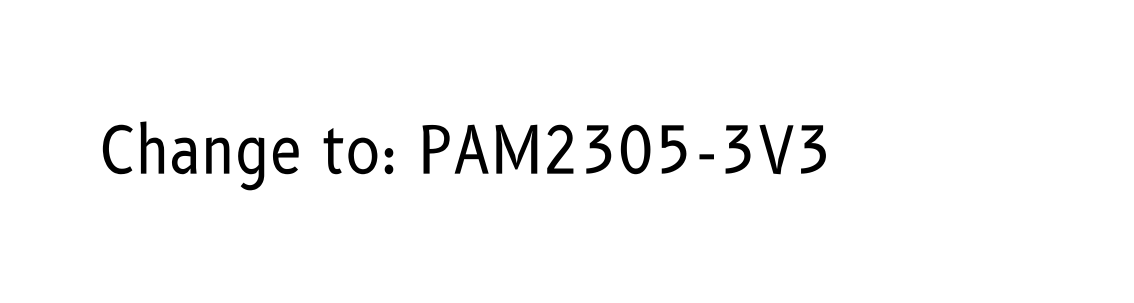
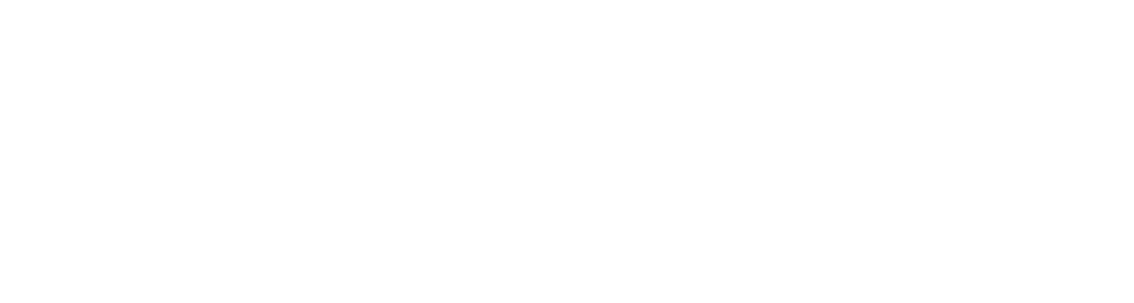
text: Change to: PAM2305-3V3 (464, 155) -> none

